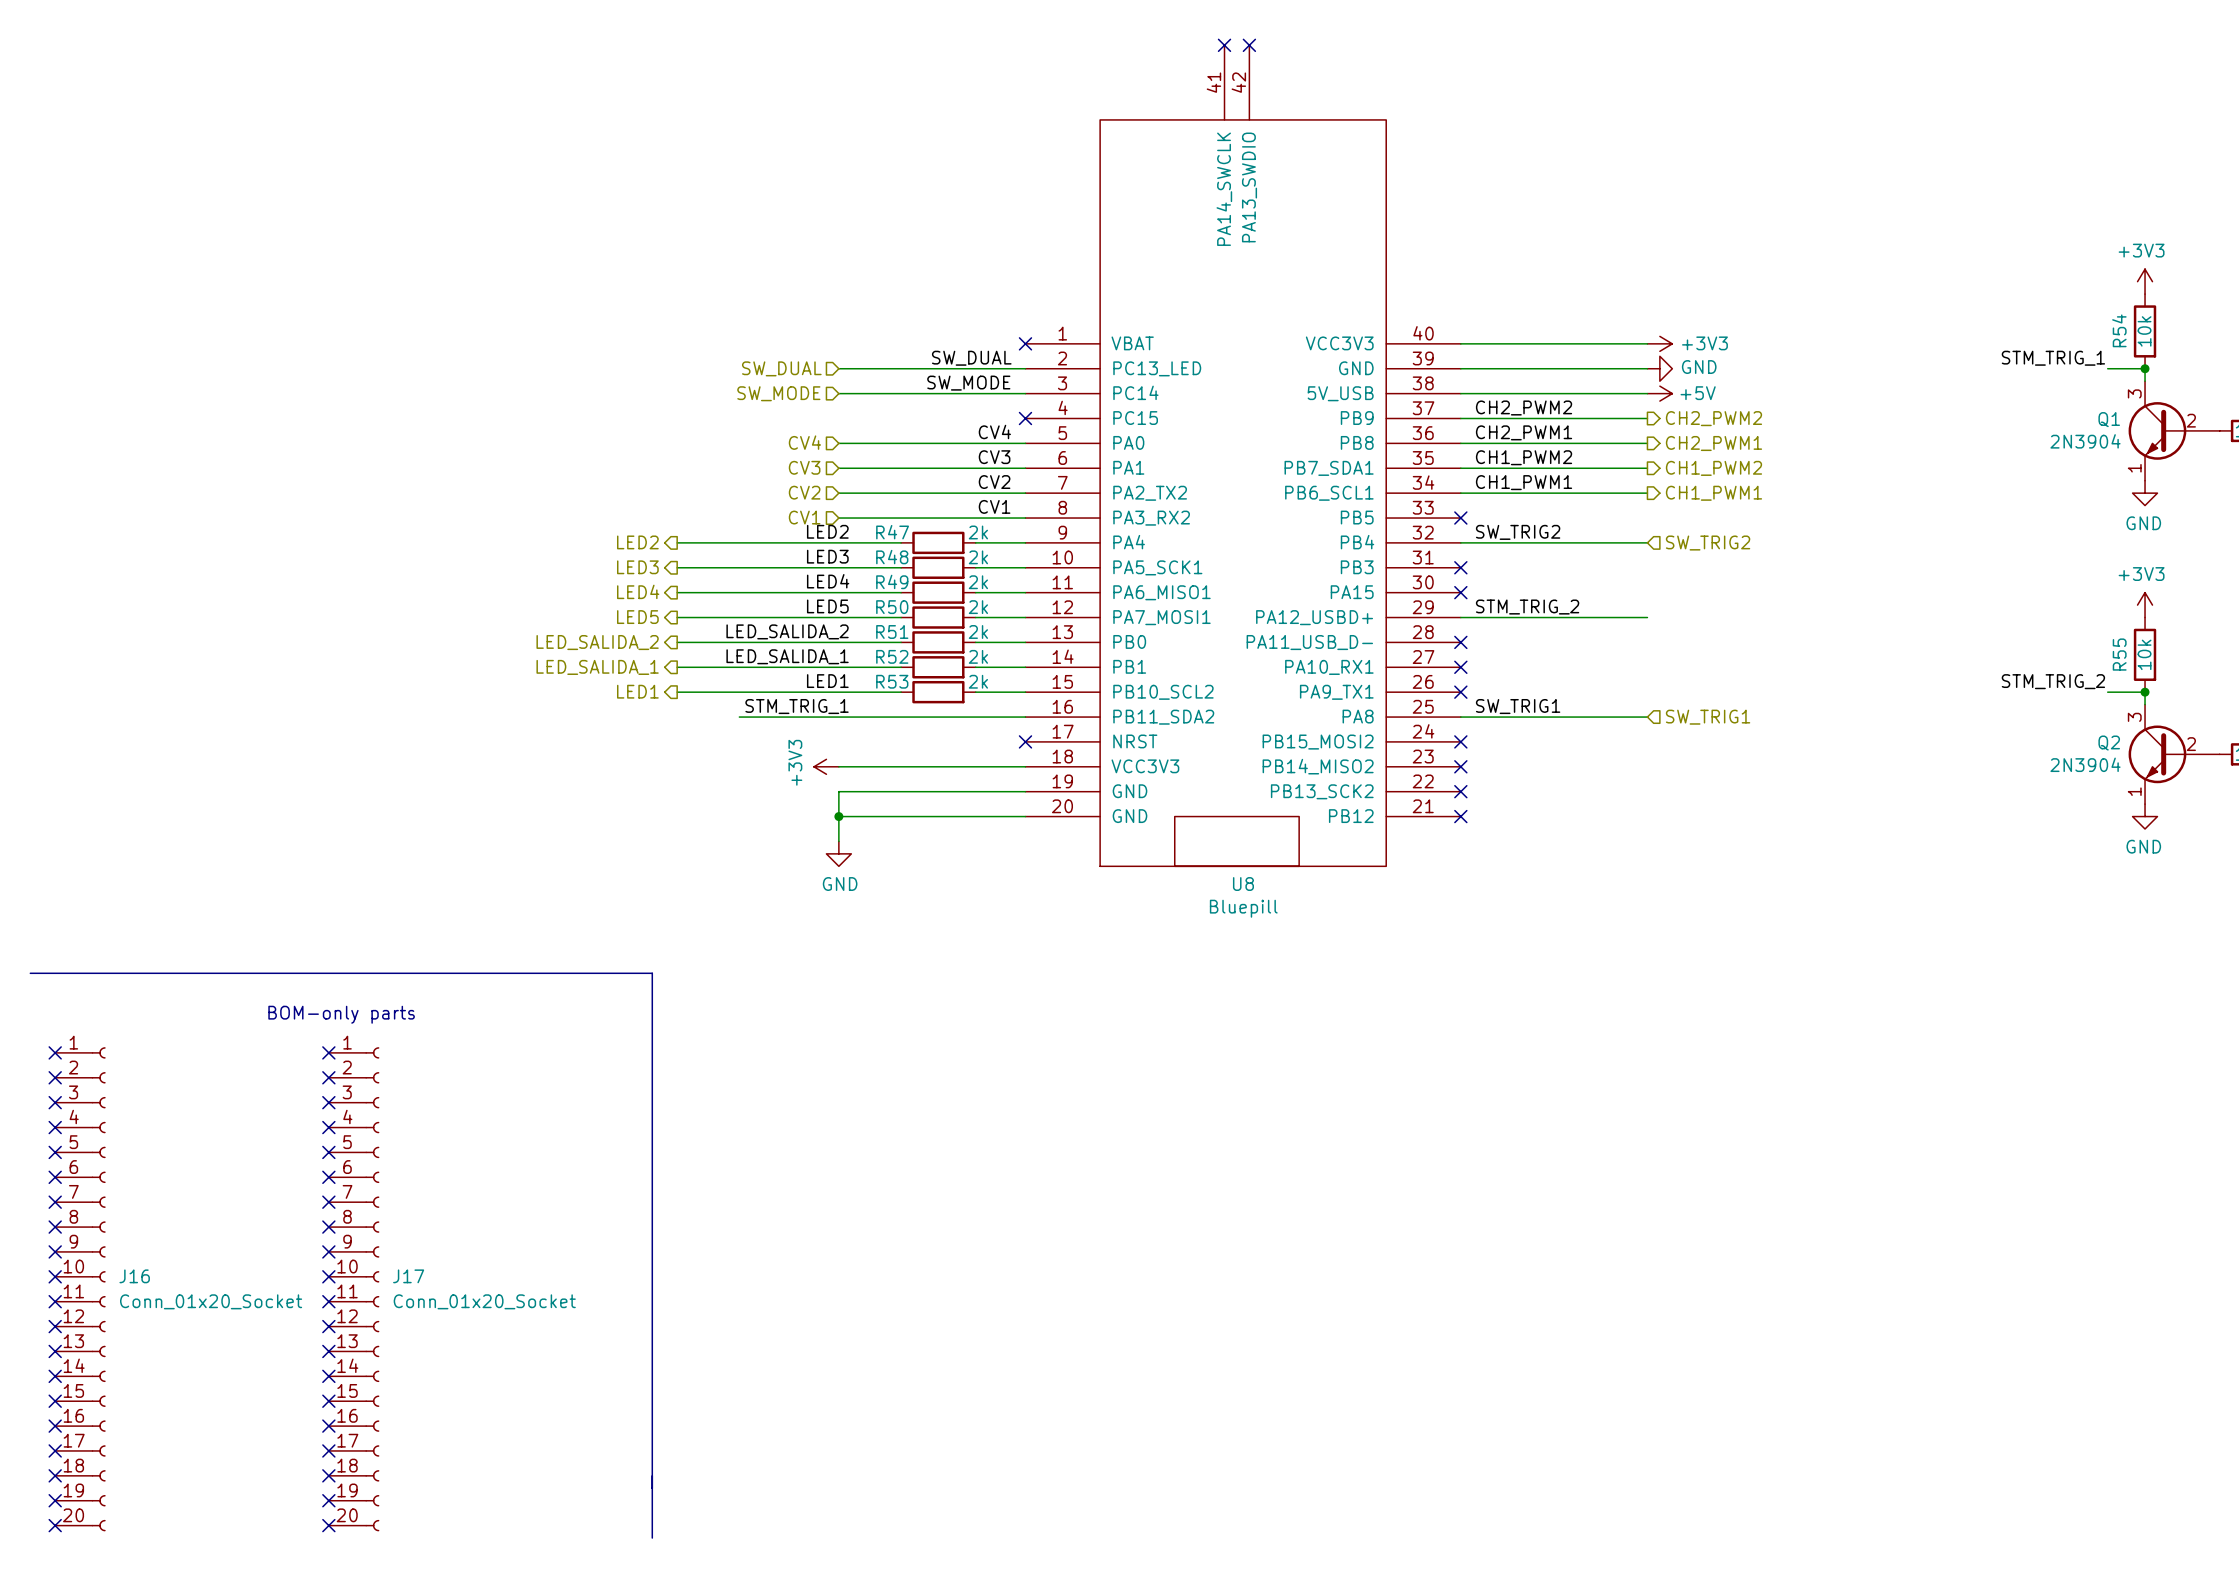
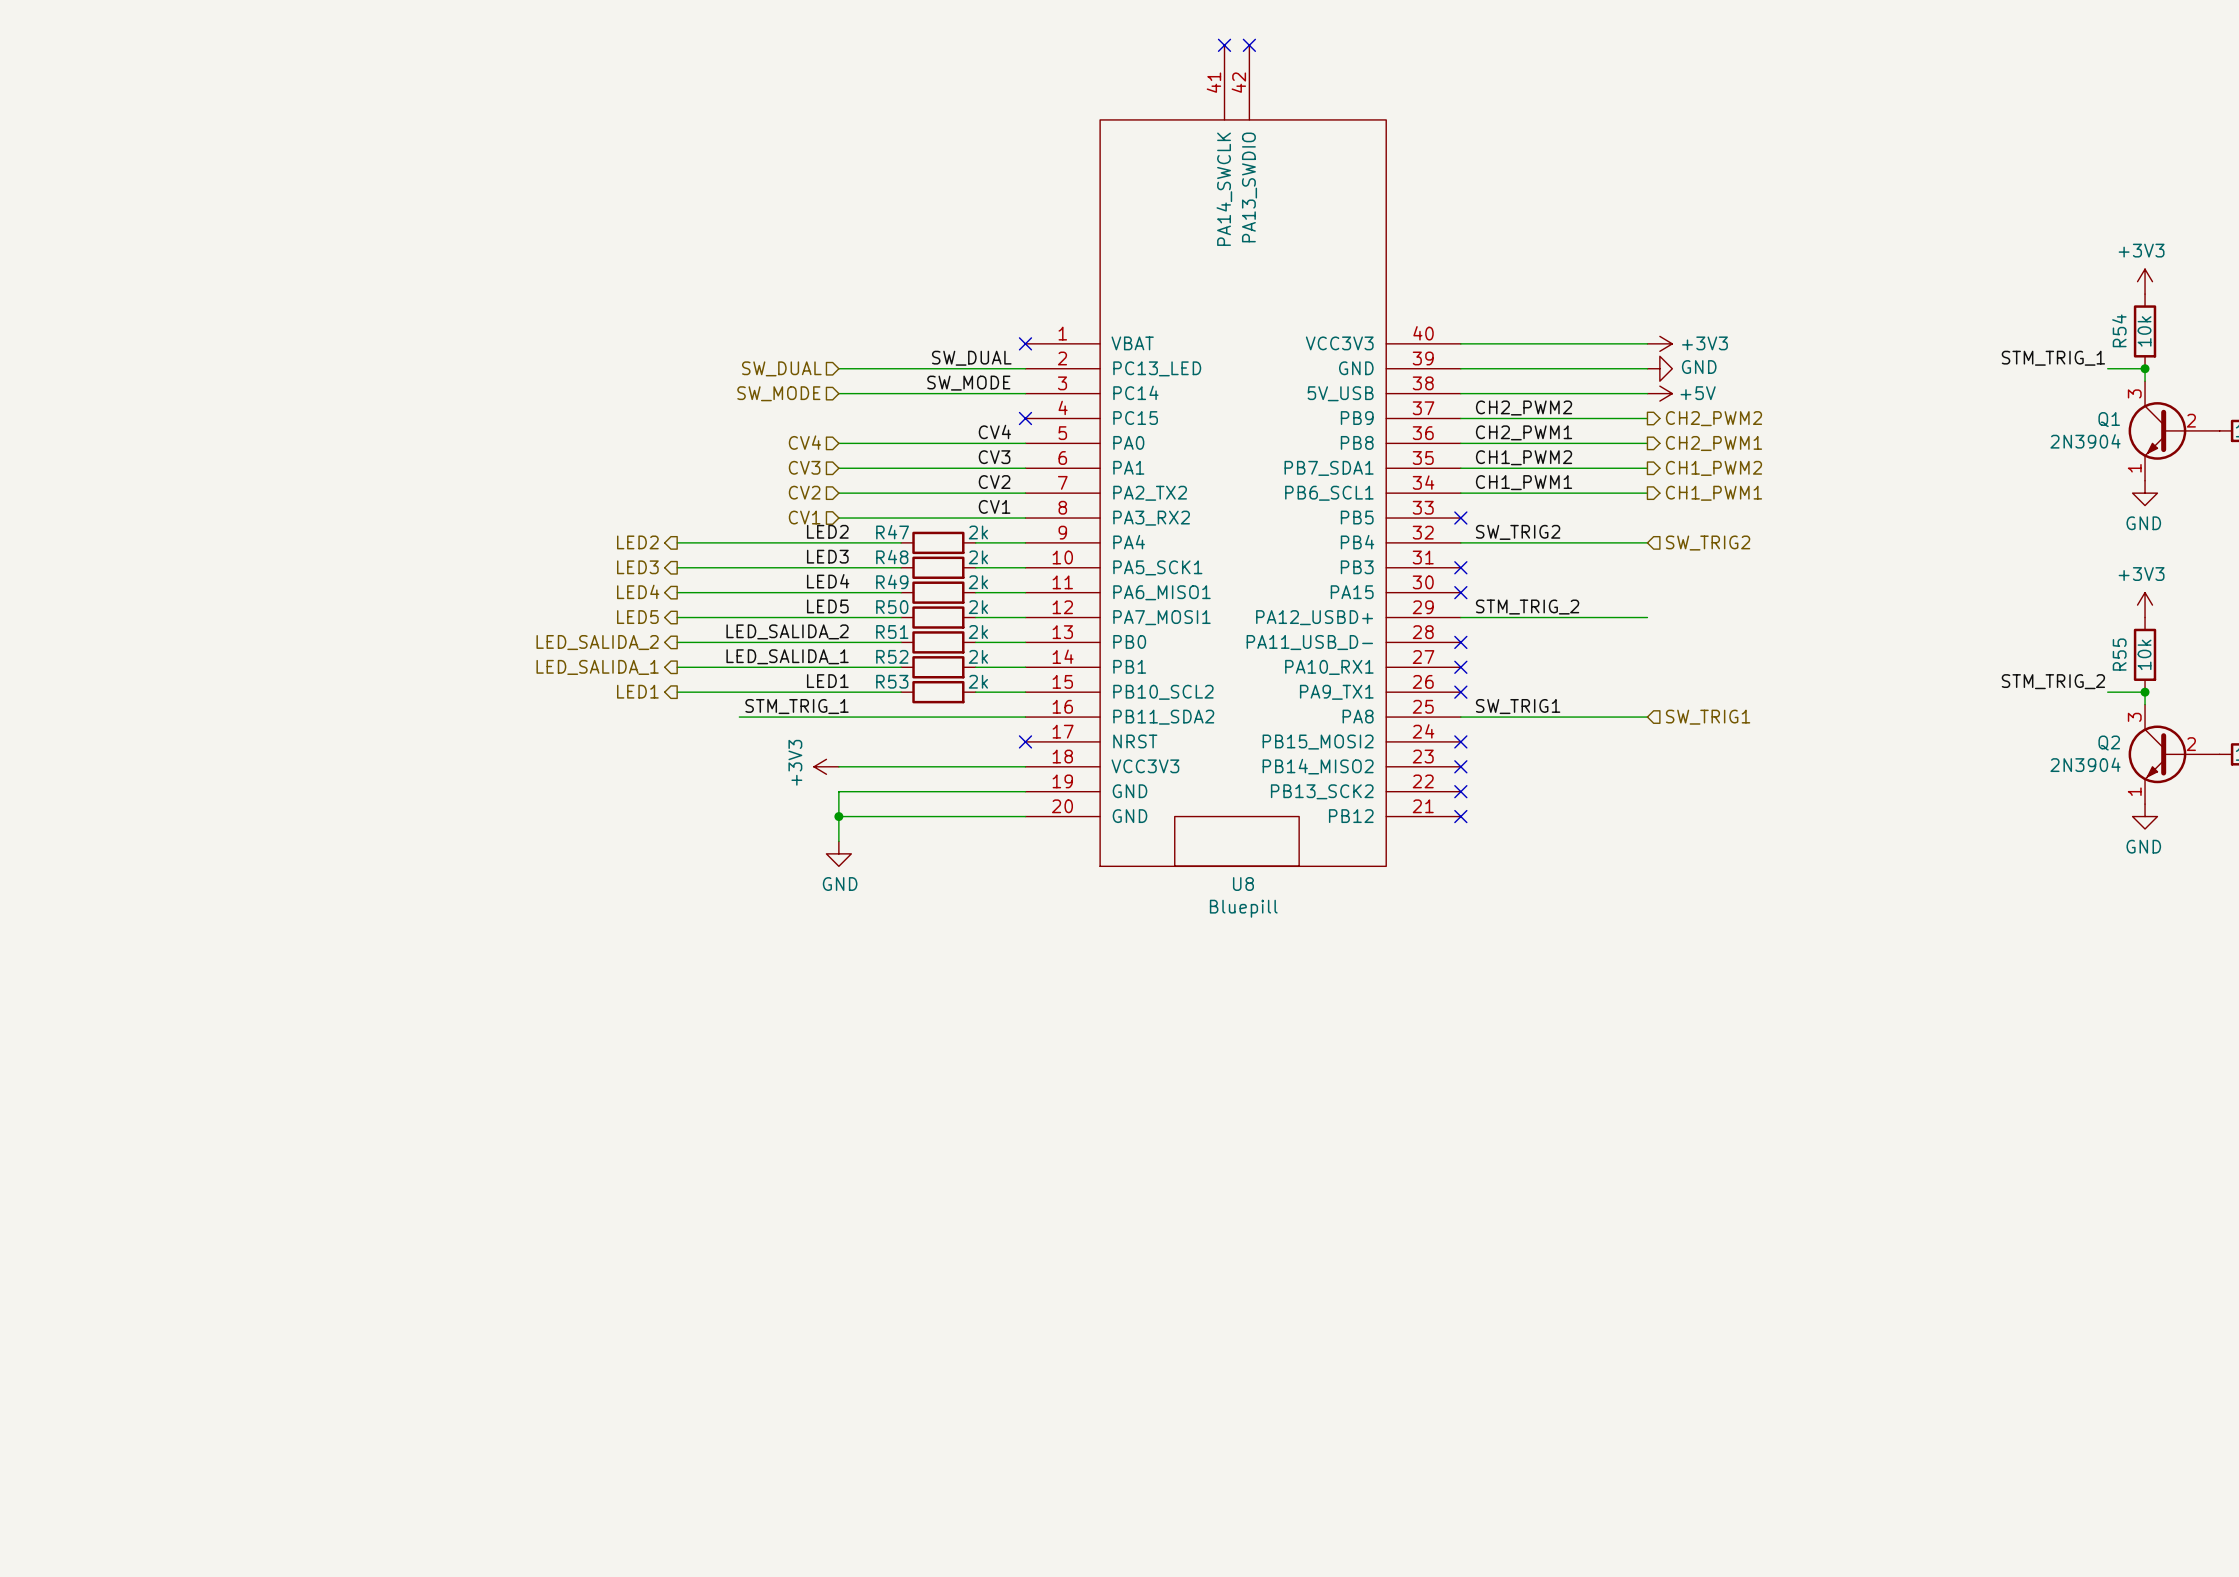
line: (30, 973) (652, 973) (652, 1538) -> none
text: BOM-only parts (341, 1014) -> none
no-connect mark: (55, 1052) -> none
no-connect mark: (328, 1052) -> none
no-connect mark: (55, 1077) -> none
no-connect mark: (328, 1077) -> none
no-connect mark: (55, 1102) -> none
no-connect mark: (328, 1102) -> none
no-connect mark: (55, 1127) -> none
no-connect mark: (328, 1127) -> none
no-connect mark: (55, 1152) -> none
no-connect mark: (328, 1152) -> none
no-connect mark: (55, 1177) -> none
no-connect mark: (328, 1177) -> none
no-connect mark: (55, 1202) -> none
no-connect mark: (328, 1202) -> none
no-connect mark: (55, 1227) -> none
no-connect mark: (328, 1227) -> none
no-connect mark: (55, 1251) -> none
no-connect mark: (328, 1251) -> none
no-connect mark: (55, 1276) -> none
no-connect mark: (328, 1276) -> none
J16: Conn_01x20_Socket (80, 1289) -> none
J17: Conn_01x20_Socket (354, 1289) -> none
no-connect mark: (55, 1301) -> none
no-connect mark: (328, 1301) -> none
no-connect mark: (55, 1326) -> none
no-connect mark: (328, 1326) -> none
no-connect mark: (55, 1351) -> none
no-connect mark: (328, 1351) -> none
no-connect mark: (55, 1376) -> none
no-connect mark: (328, 1376) -> none
no-connect mark: (55, 1401) -> none
no-connect mark: (328, 1401) -> none
no-connect mark: (55, 1426) -> none
no-connect mark: (328, 1426) -> none
no-connect mark: (55, 1450) -> none
no-connect mark: (328, 1450) -> none
no-connect mark: (55, 1475) -> none
no-connect mark: (328, 1475) -> none
no-connect mark: (55, 1500) -> none
no-connect mark: (328, 1500) -> none
no-connect mark: (55, 1525) -> none
no-connect mark: (328, 1525) -> none

